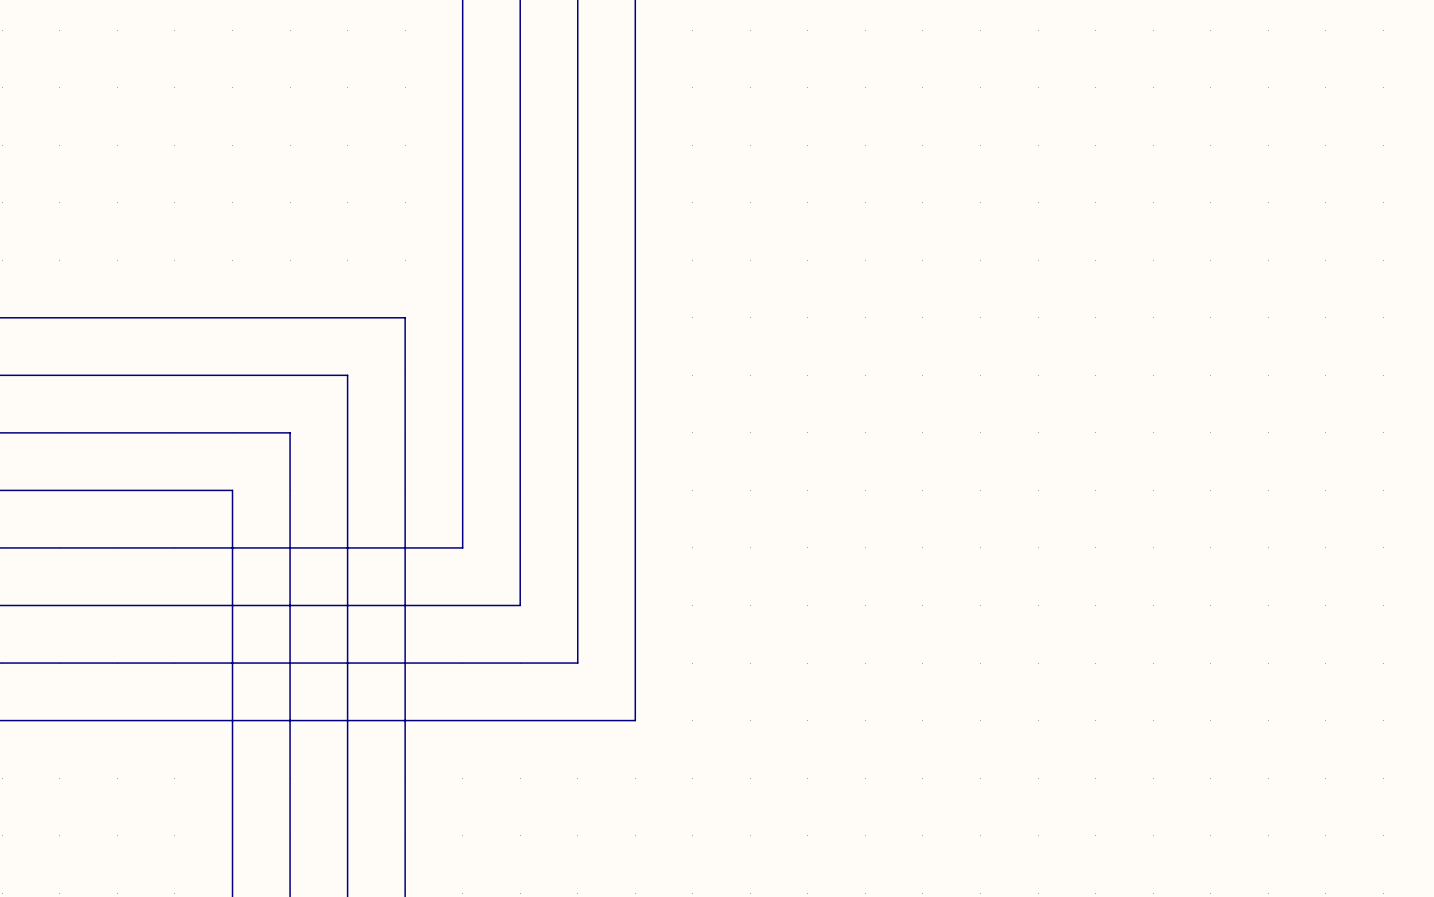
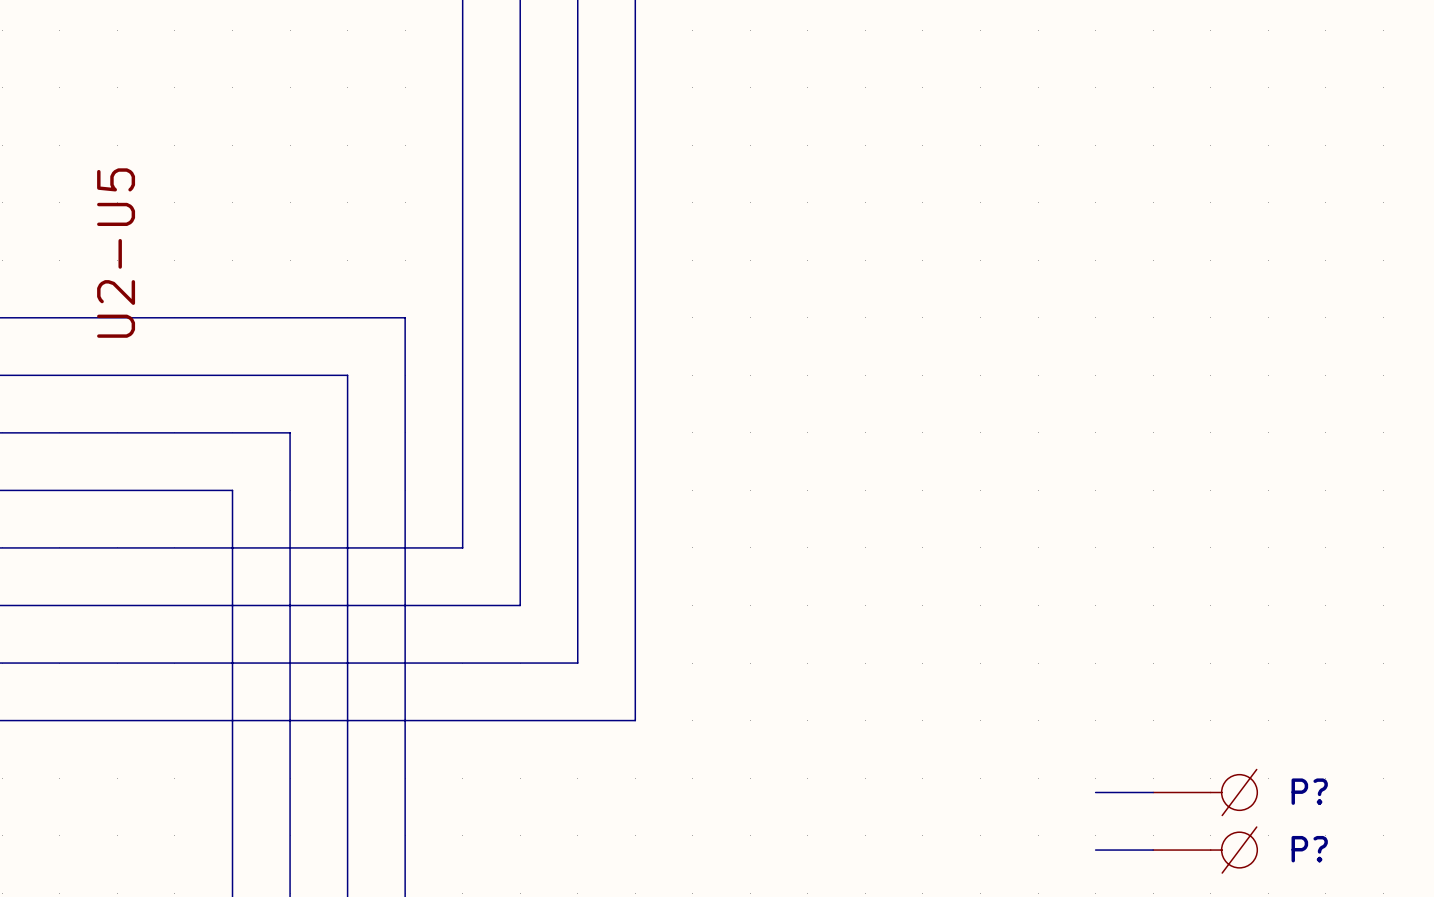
label: none -> U2-U5 (116, 253)
wire: none -> (1095, 792) (1153, 792)
P?: none -> (1205, 792)
wire: none -> (1095, 850) (1153, 850)
P?: none -> (1205, 850)

